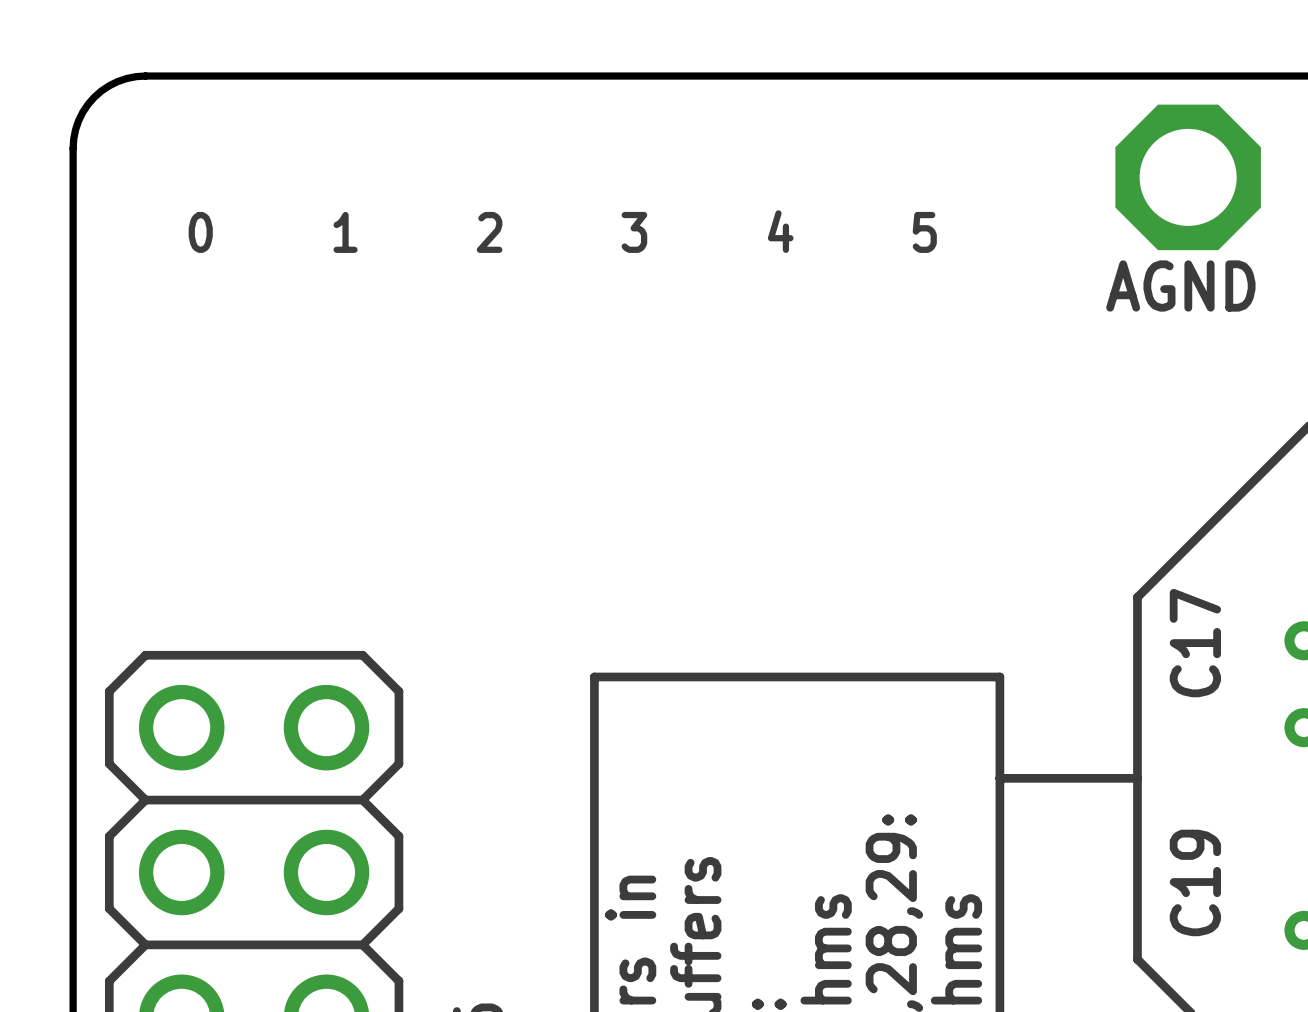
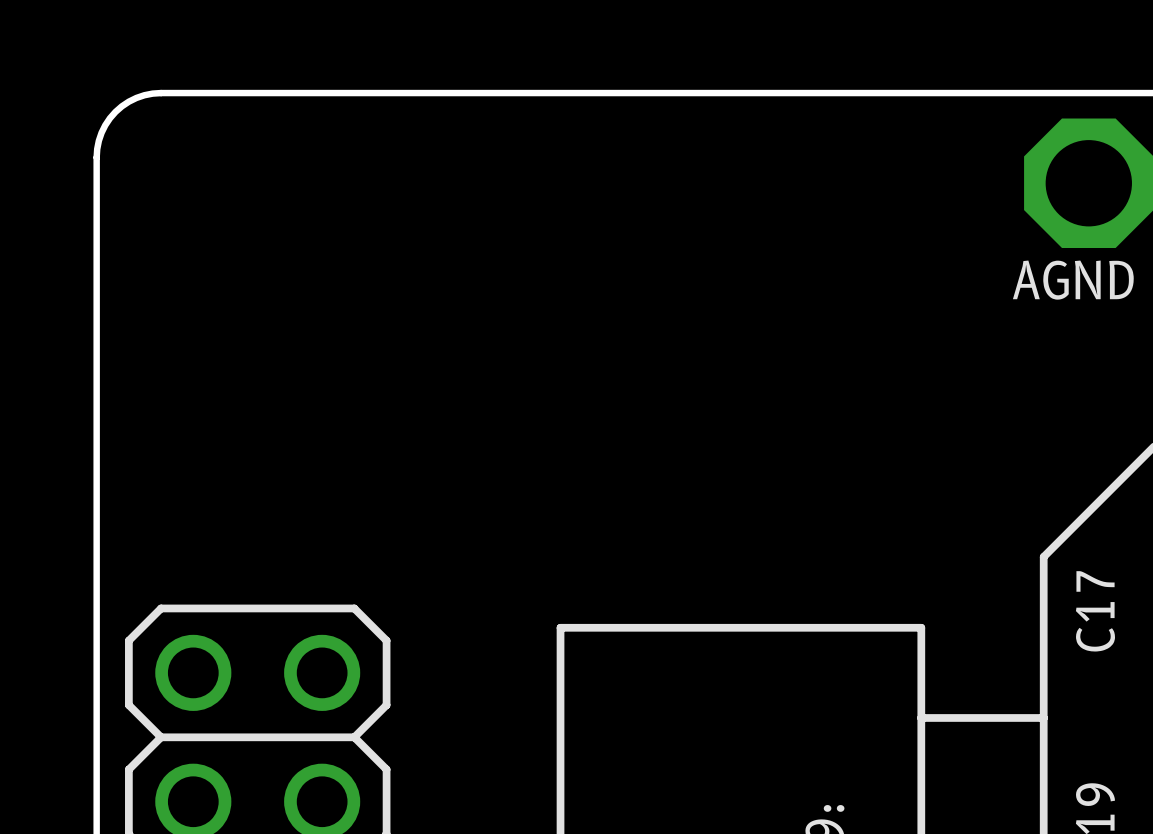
text: 4 (780, 231) -> none
text: 0 (200, 232) -> none
text: 1 (345, 232) -> none
text: 2 (489, 232) -> none
text: 3 (634, 232) -> none
text: 5 (924, 232) -> none

